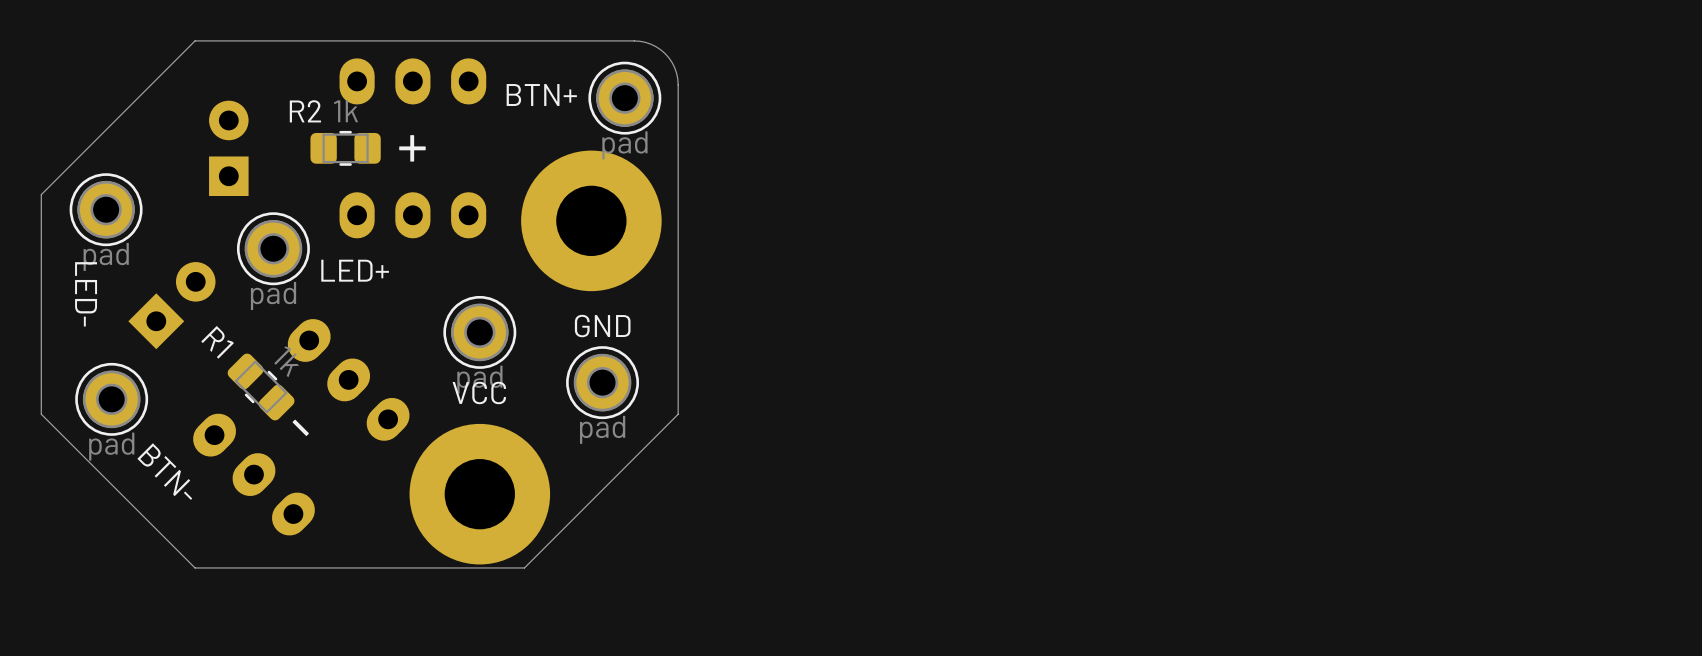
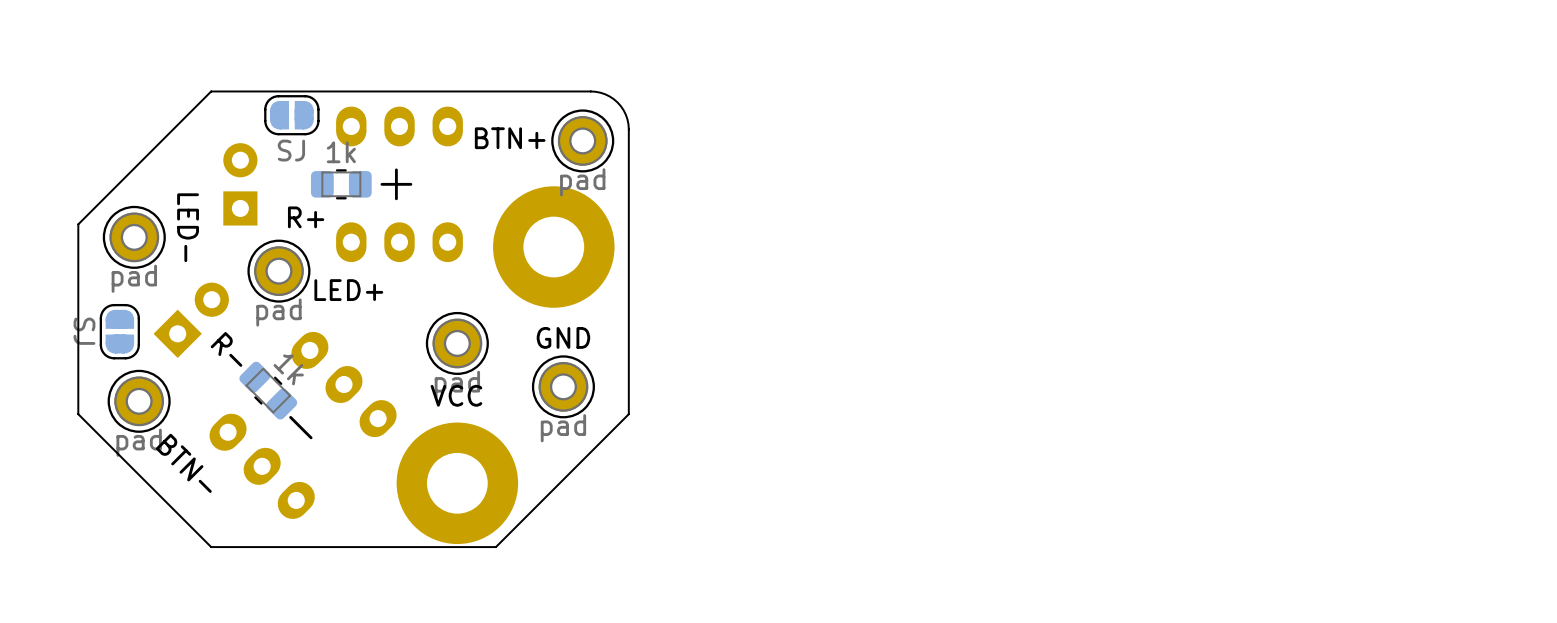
part: none -> SJ (291, 115)
R2 name: R2 (305, 111) -> R+ (306, 217)
LED- name position: LED- (86, 294) -> LED- (188, 227)
part: none -> SJ (119, 331)
R1 name: R1 (217, 342) -> R- (226, 349)

